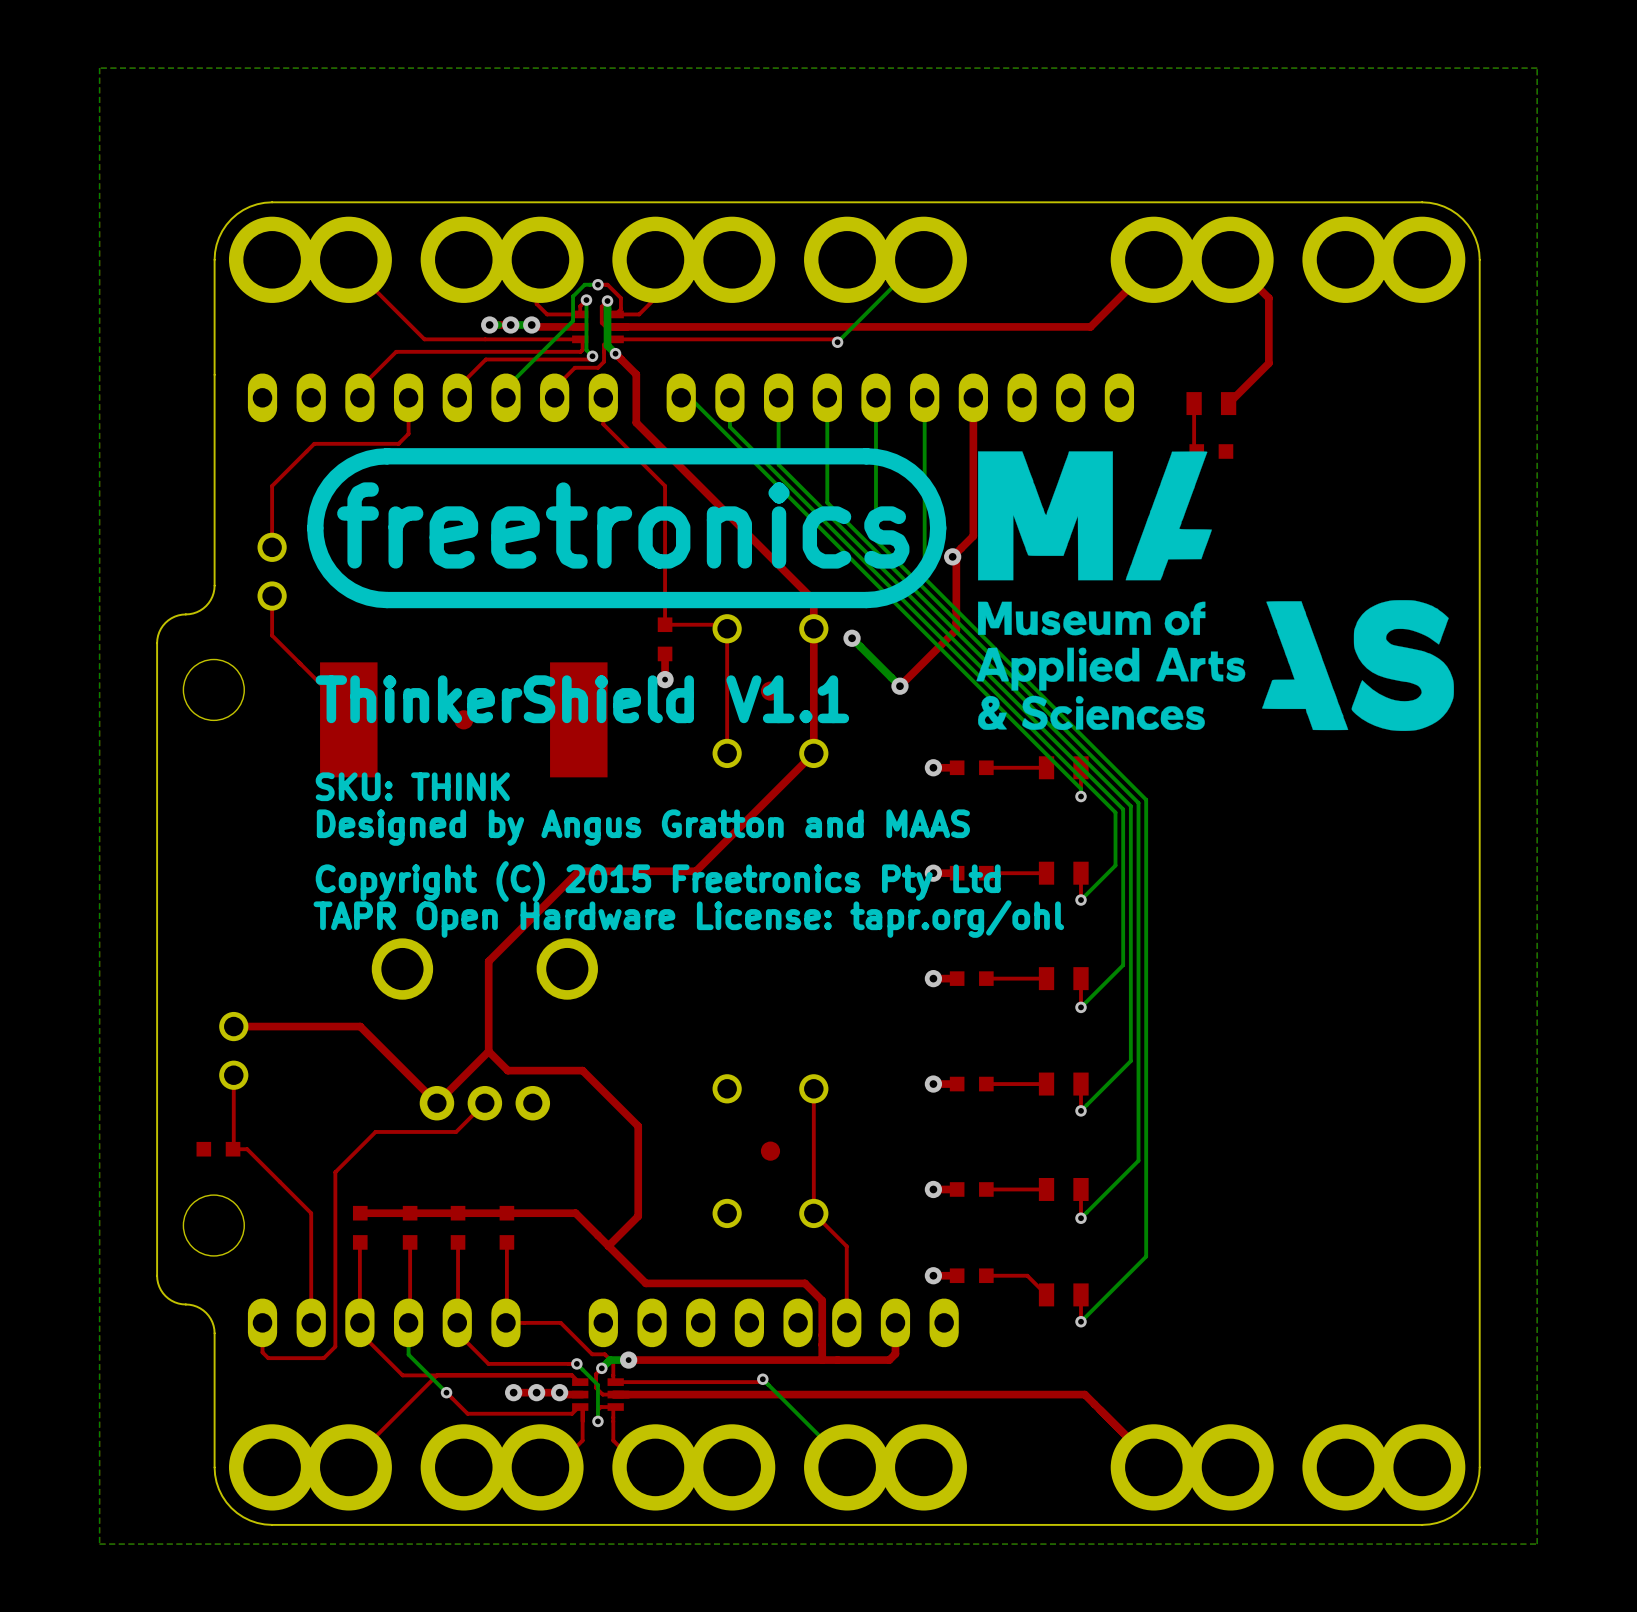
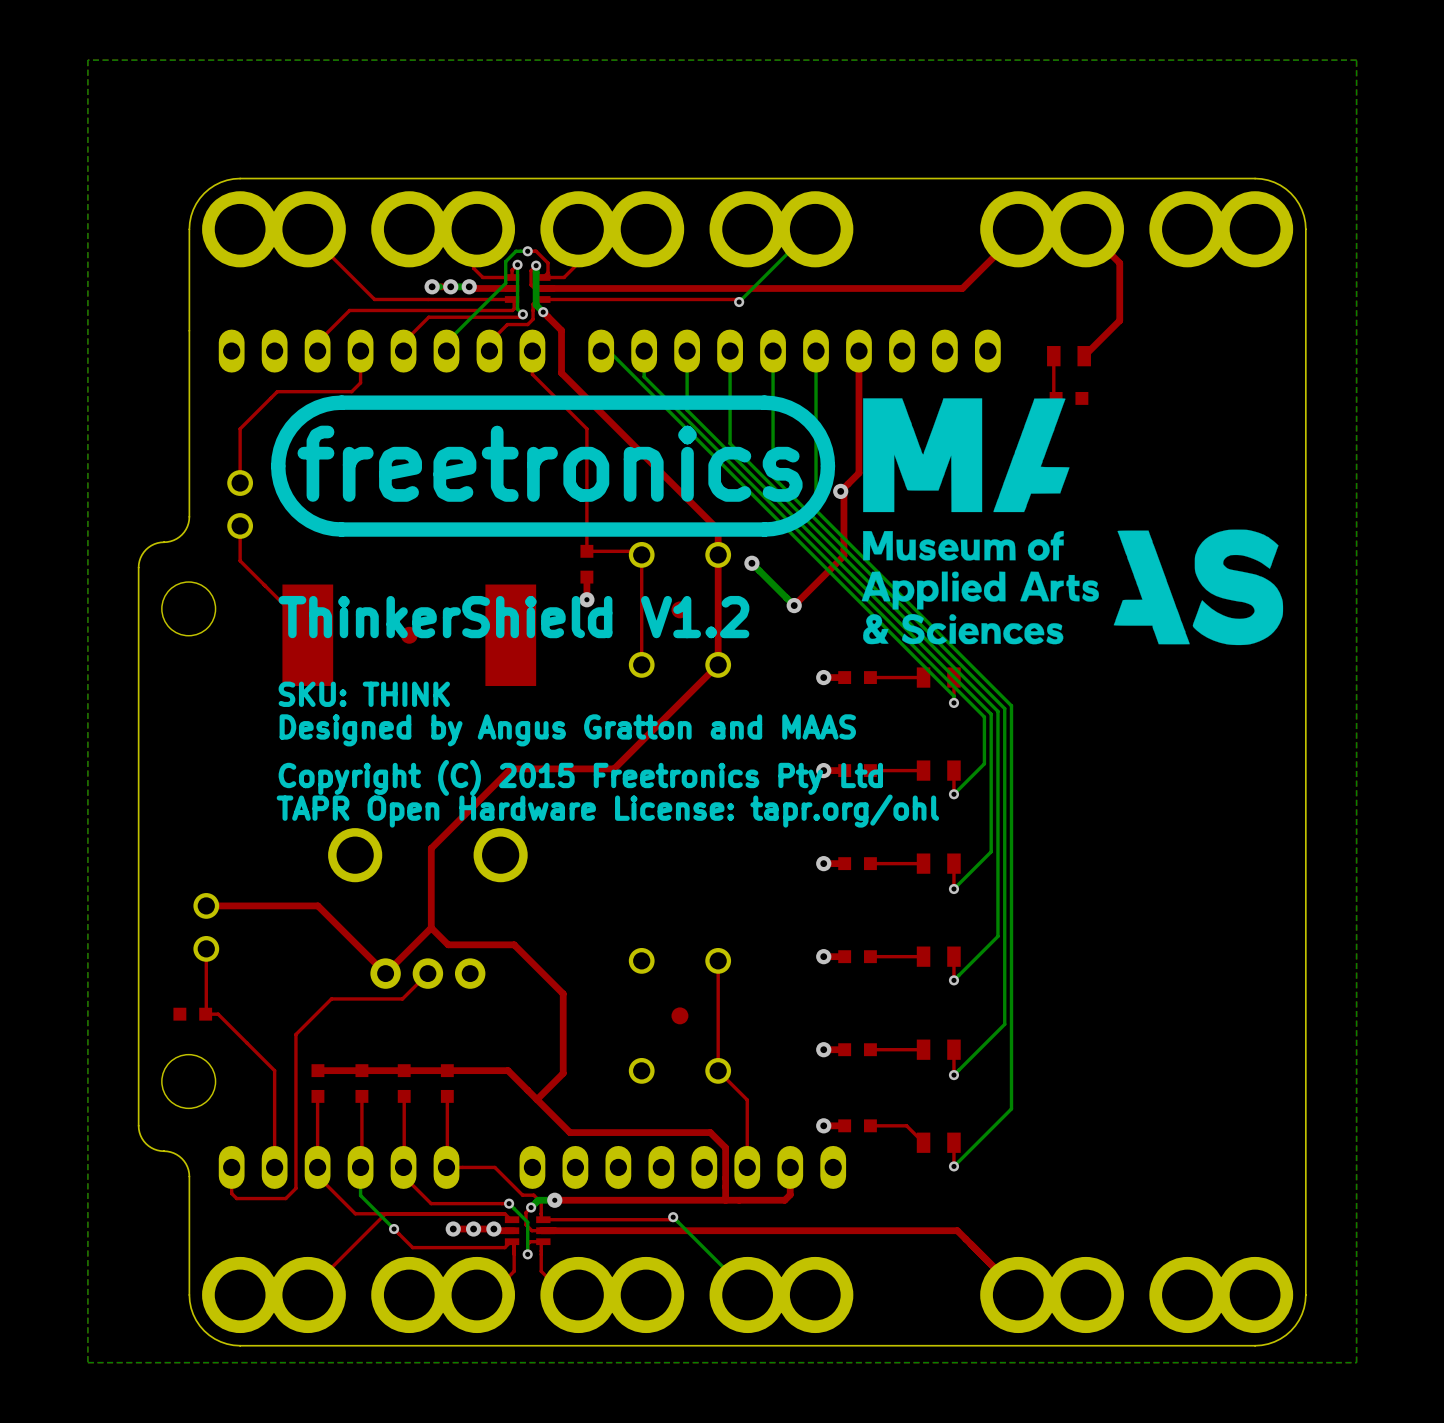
text: ThinkerShield V1.1 (582, 699) -> ThinkerShield V1.2 (513, 617)

